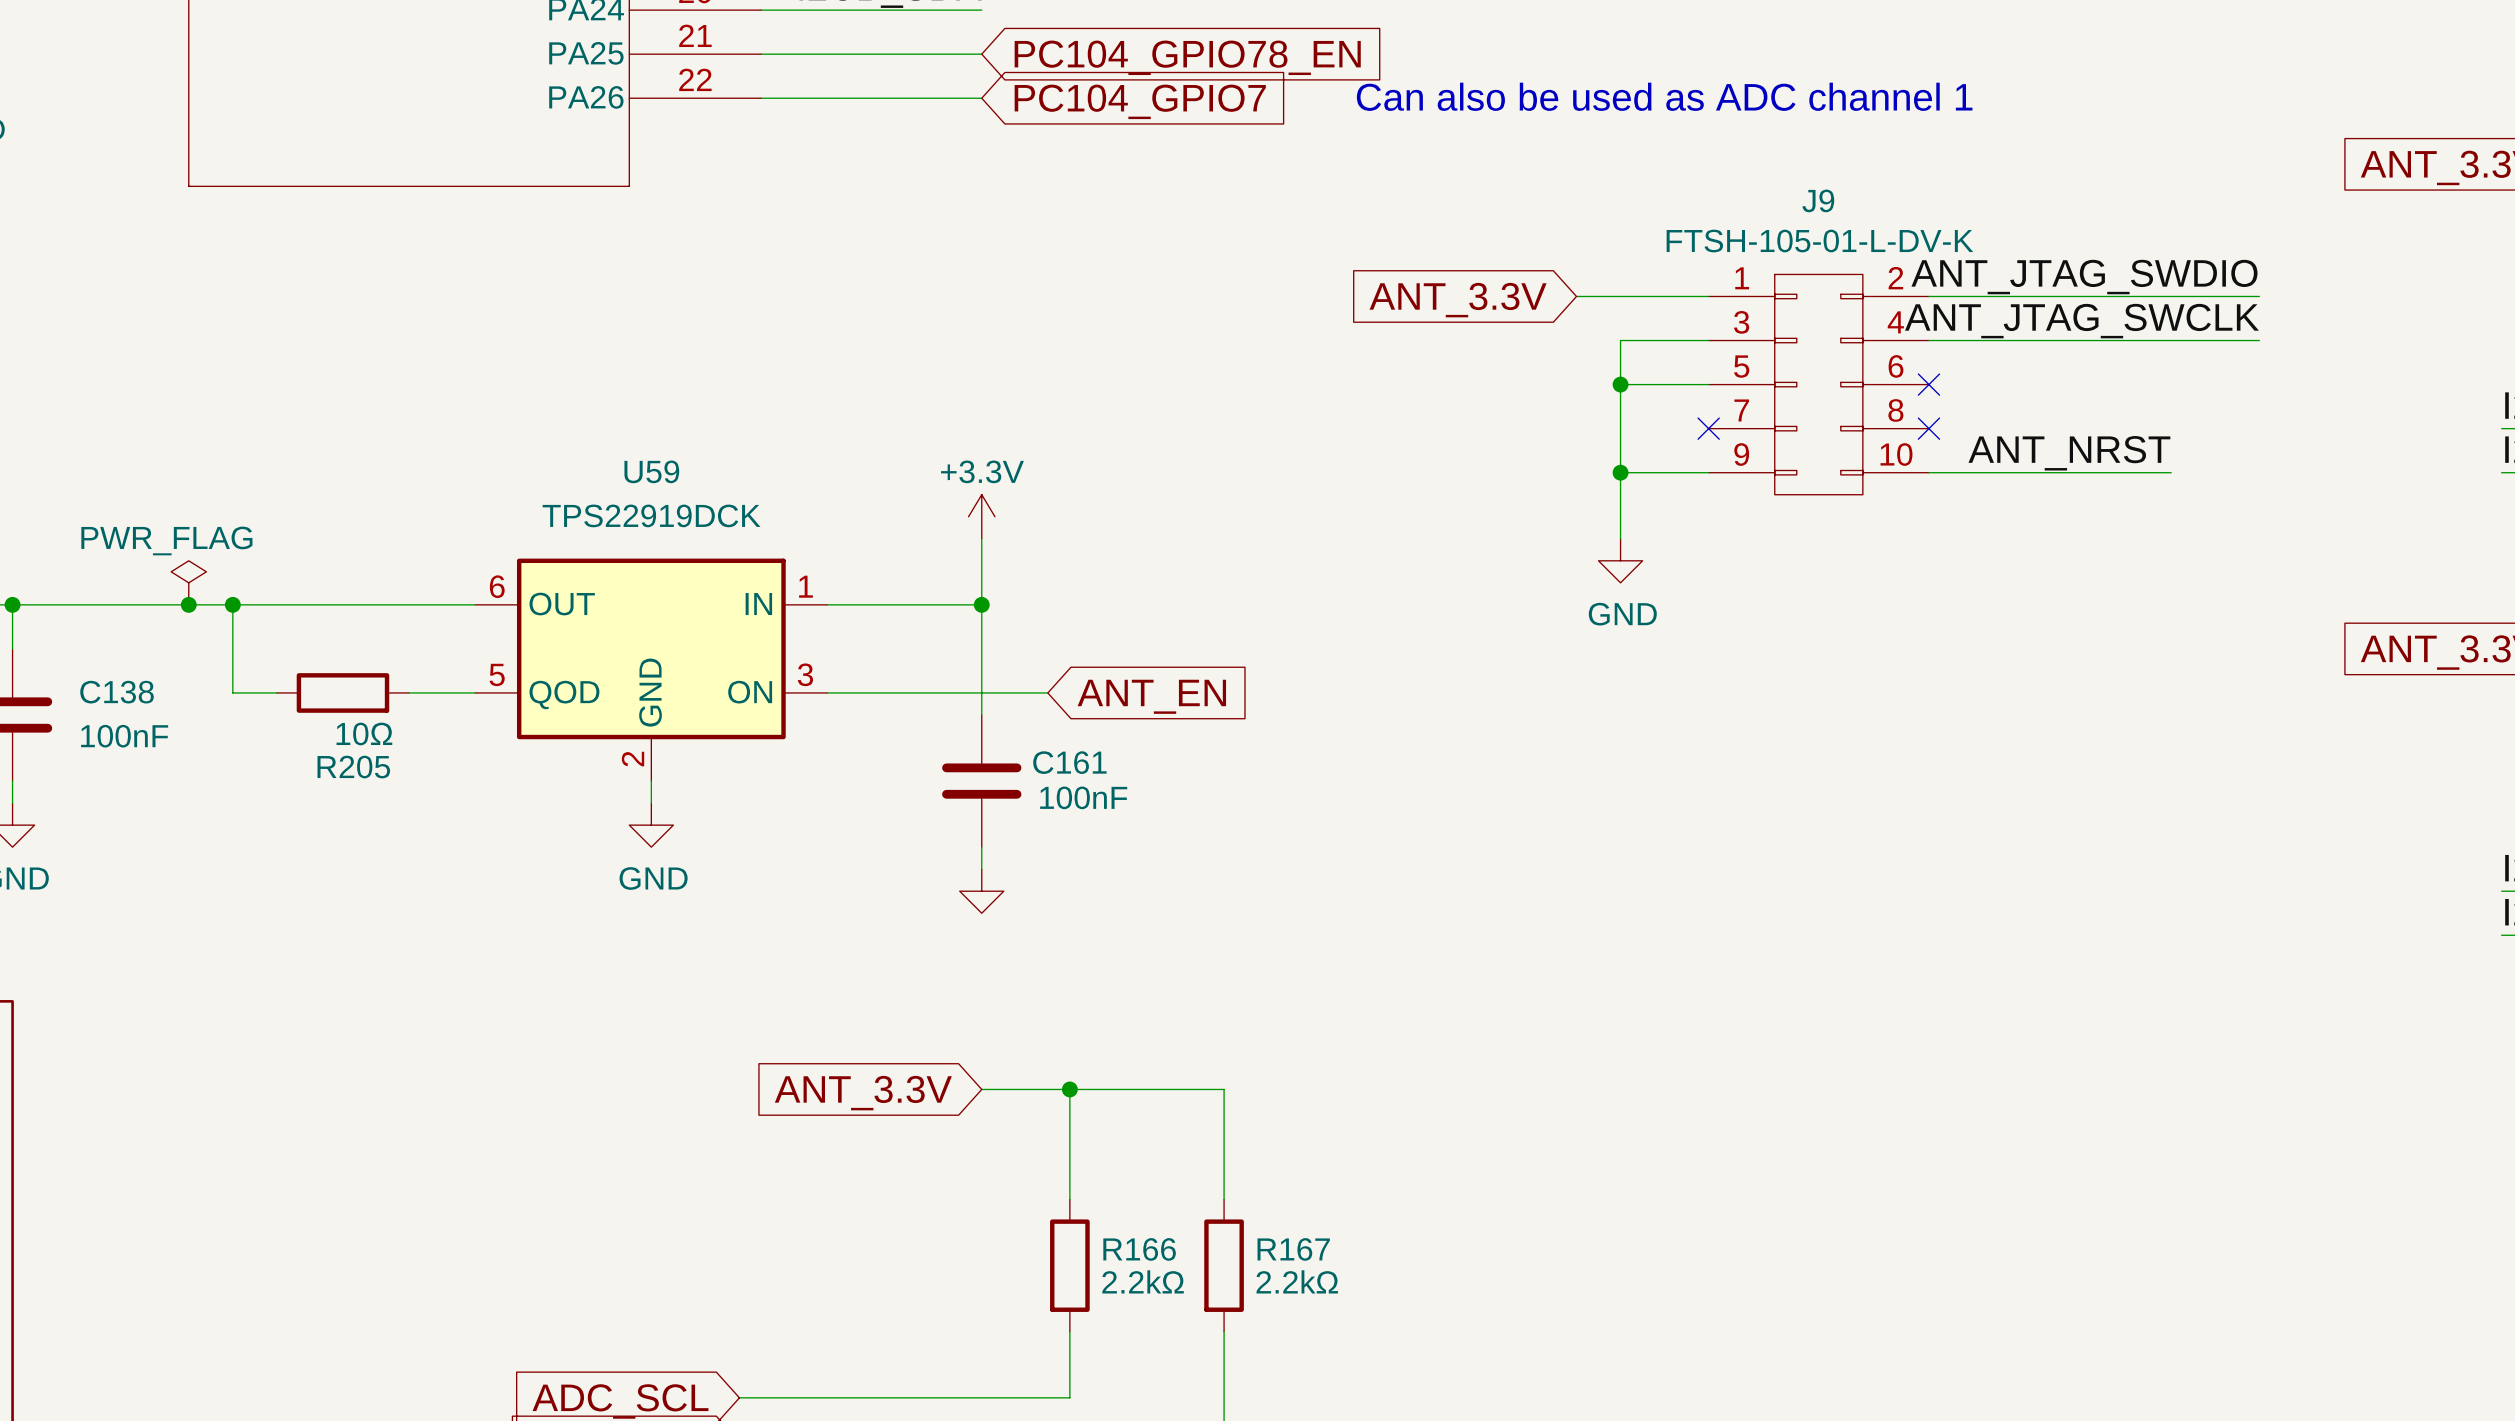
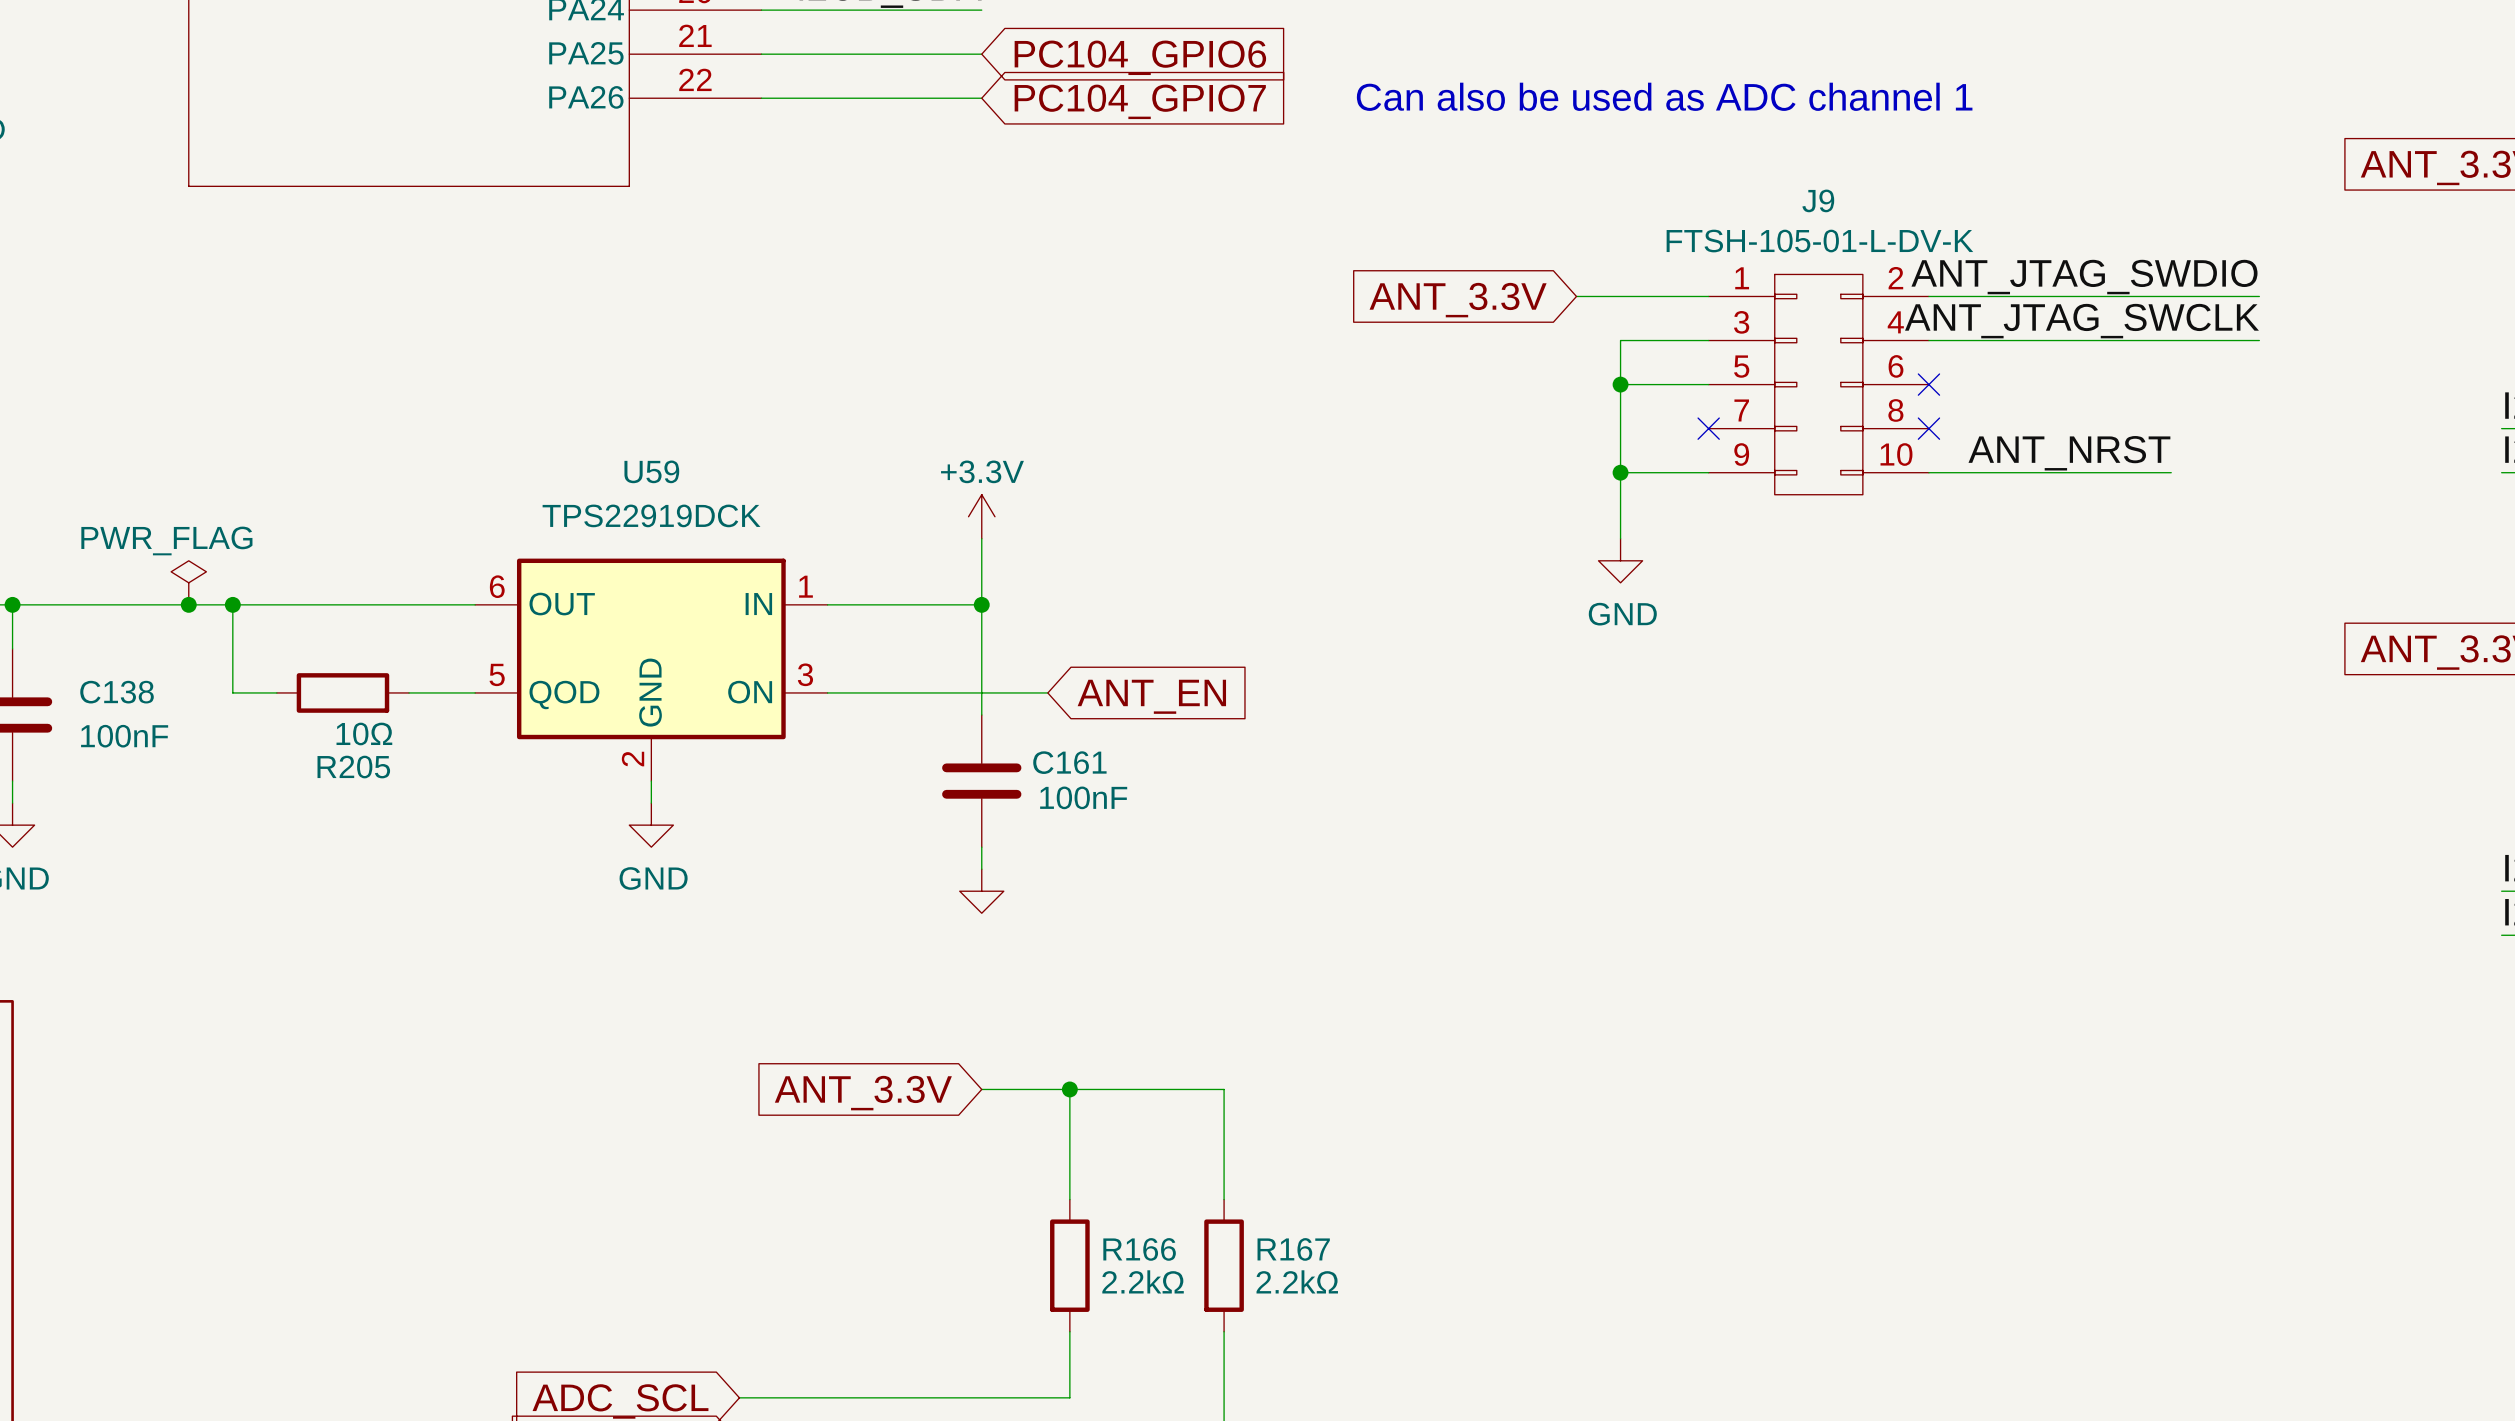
global label: PC104_GPIO78_EN (1187, 57) -> PC104_GPIO6 (1140, 57)

